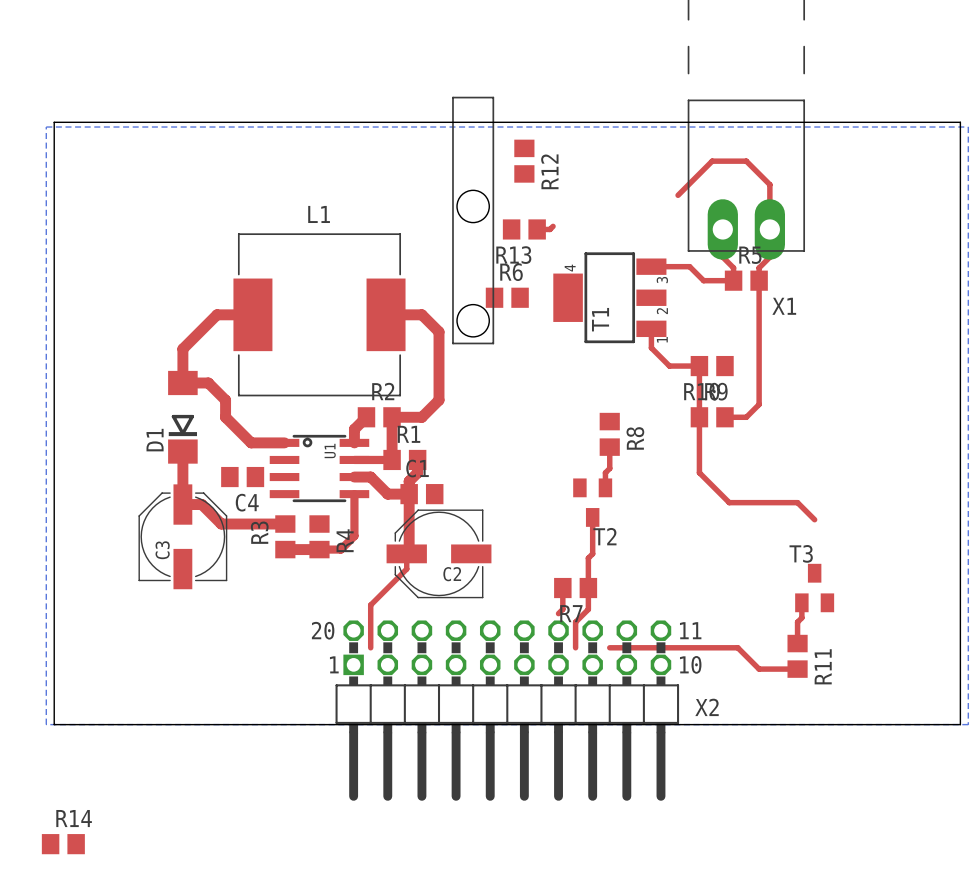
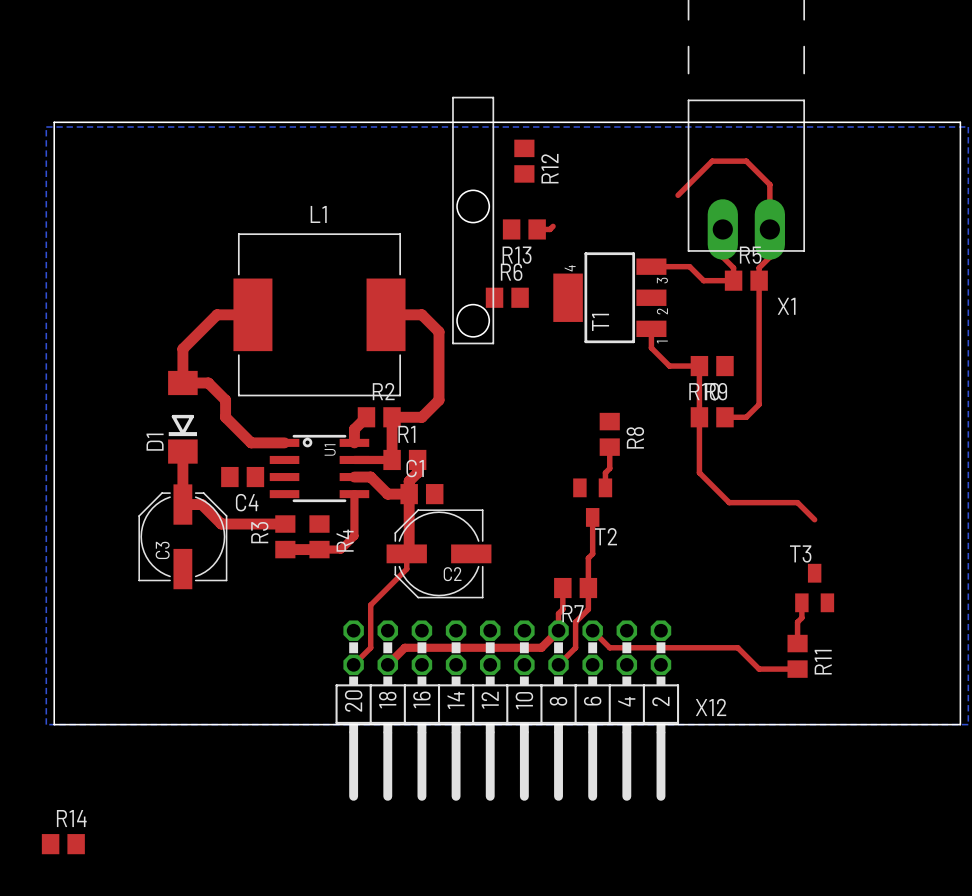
X2: (507, 461) -> none
X12: none -> (507, 461)
top track: none -> (558, 613) (558, 630) (541, 647) (404, 647) (387, 664)
top track: none -> (592, 630) (609, 647)
top track: none -> (370, 647) (353, 664)
top track: none -> (575, 647) (558, 664)

